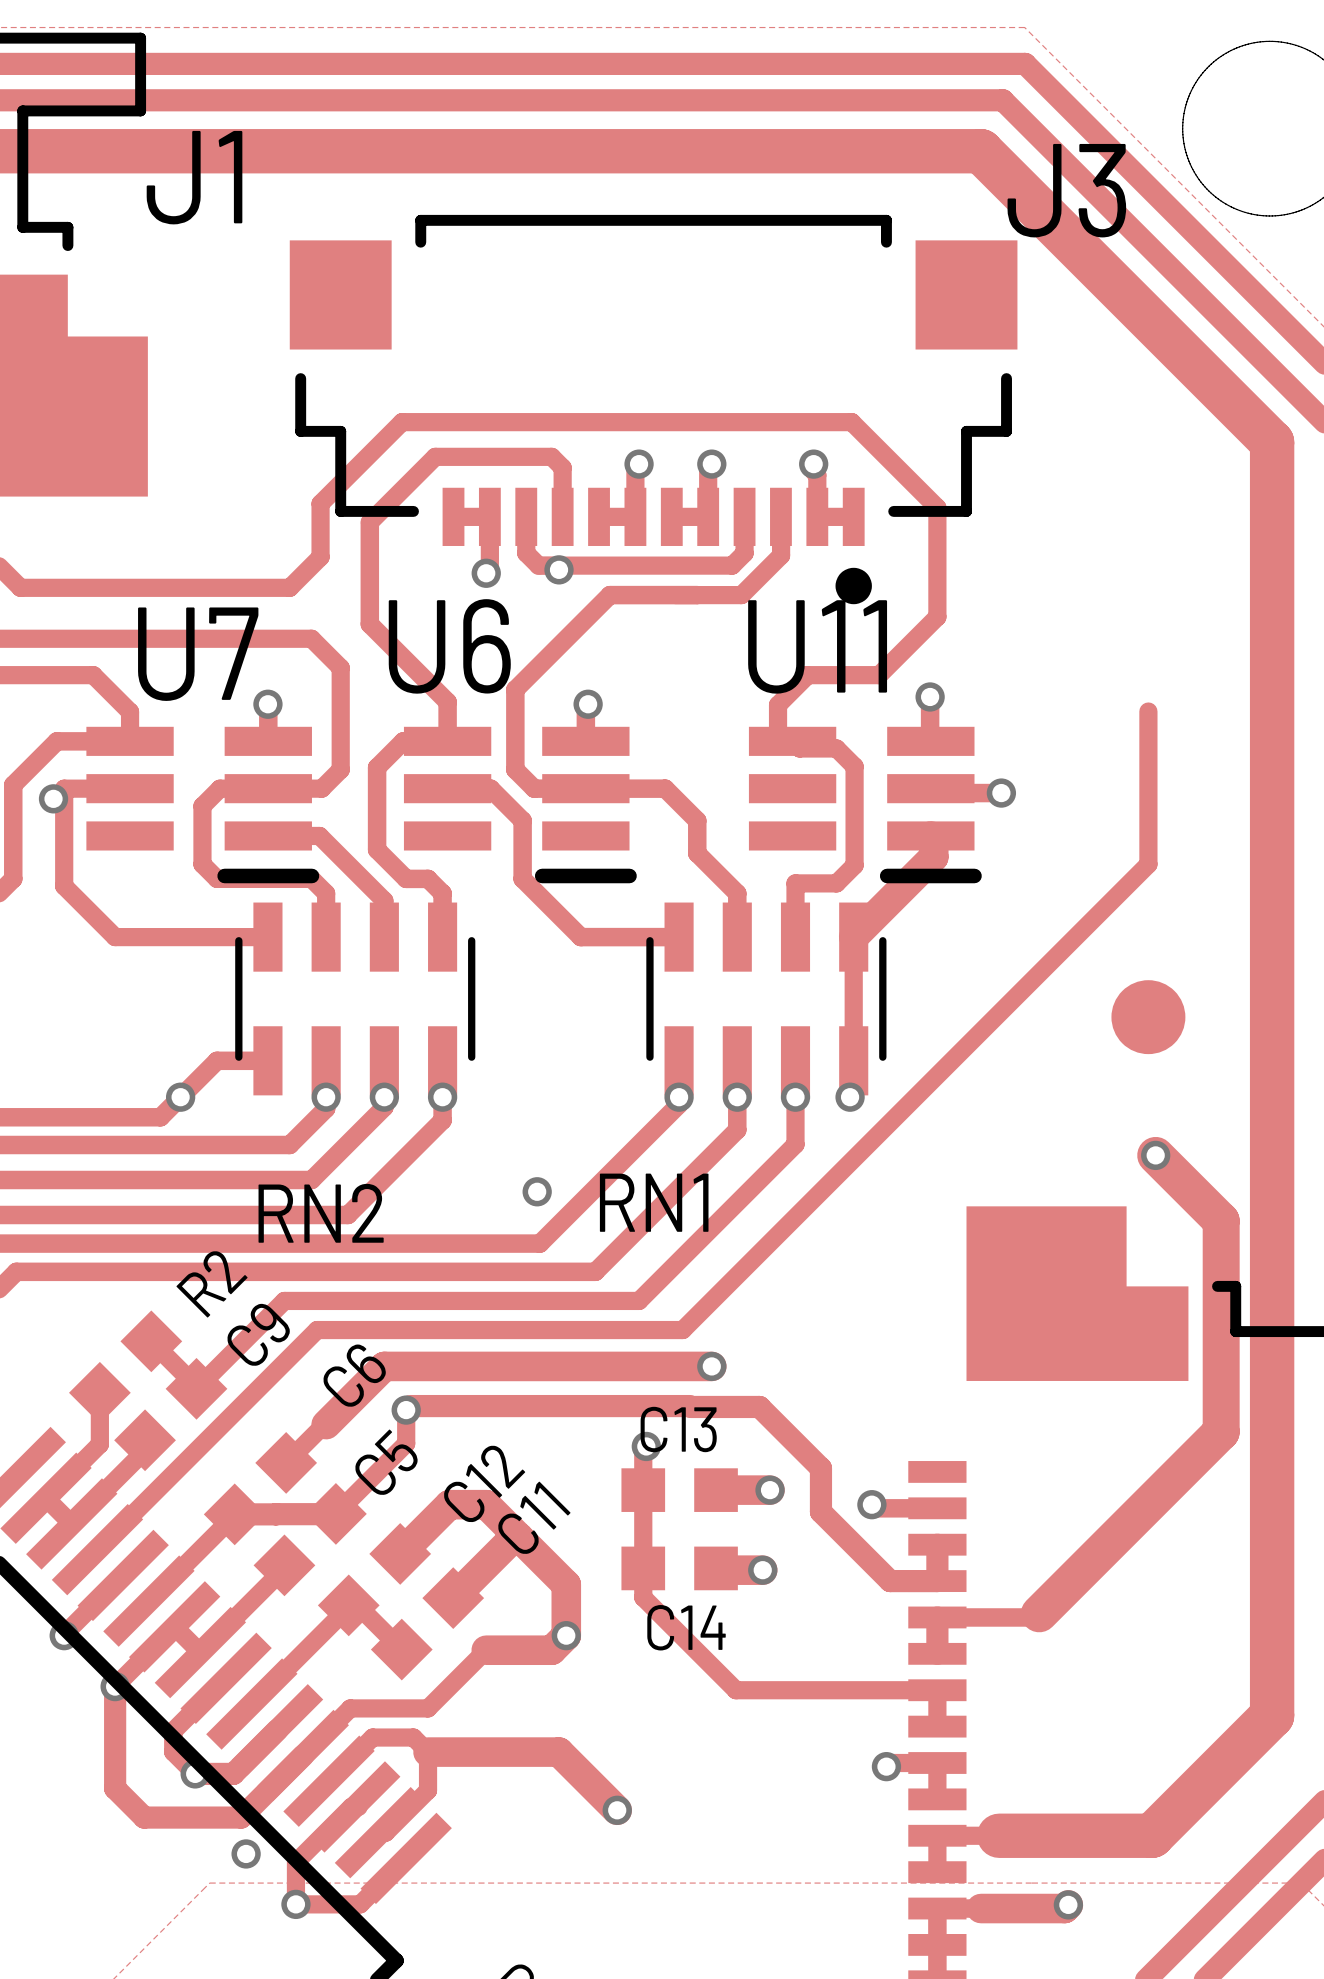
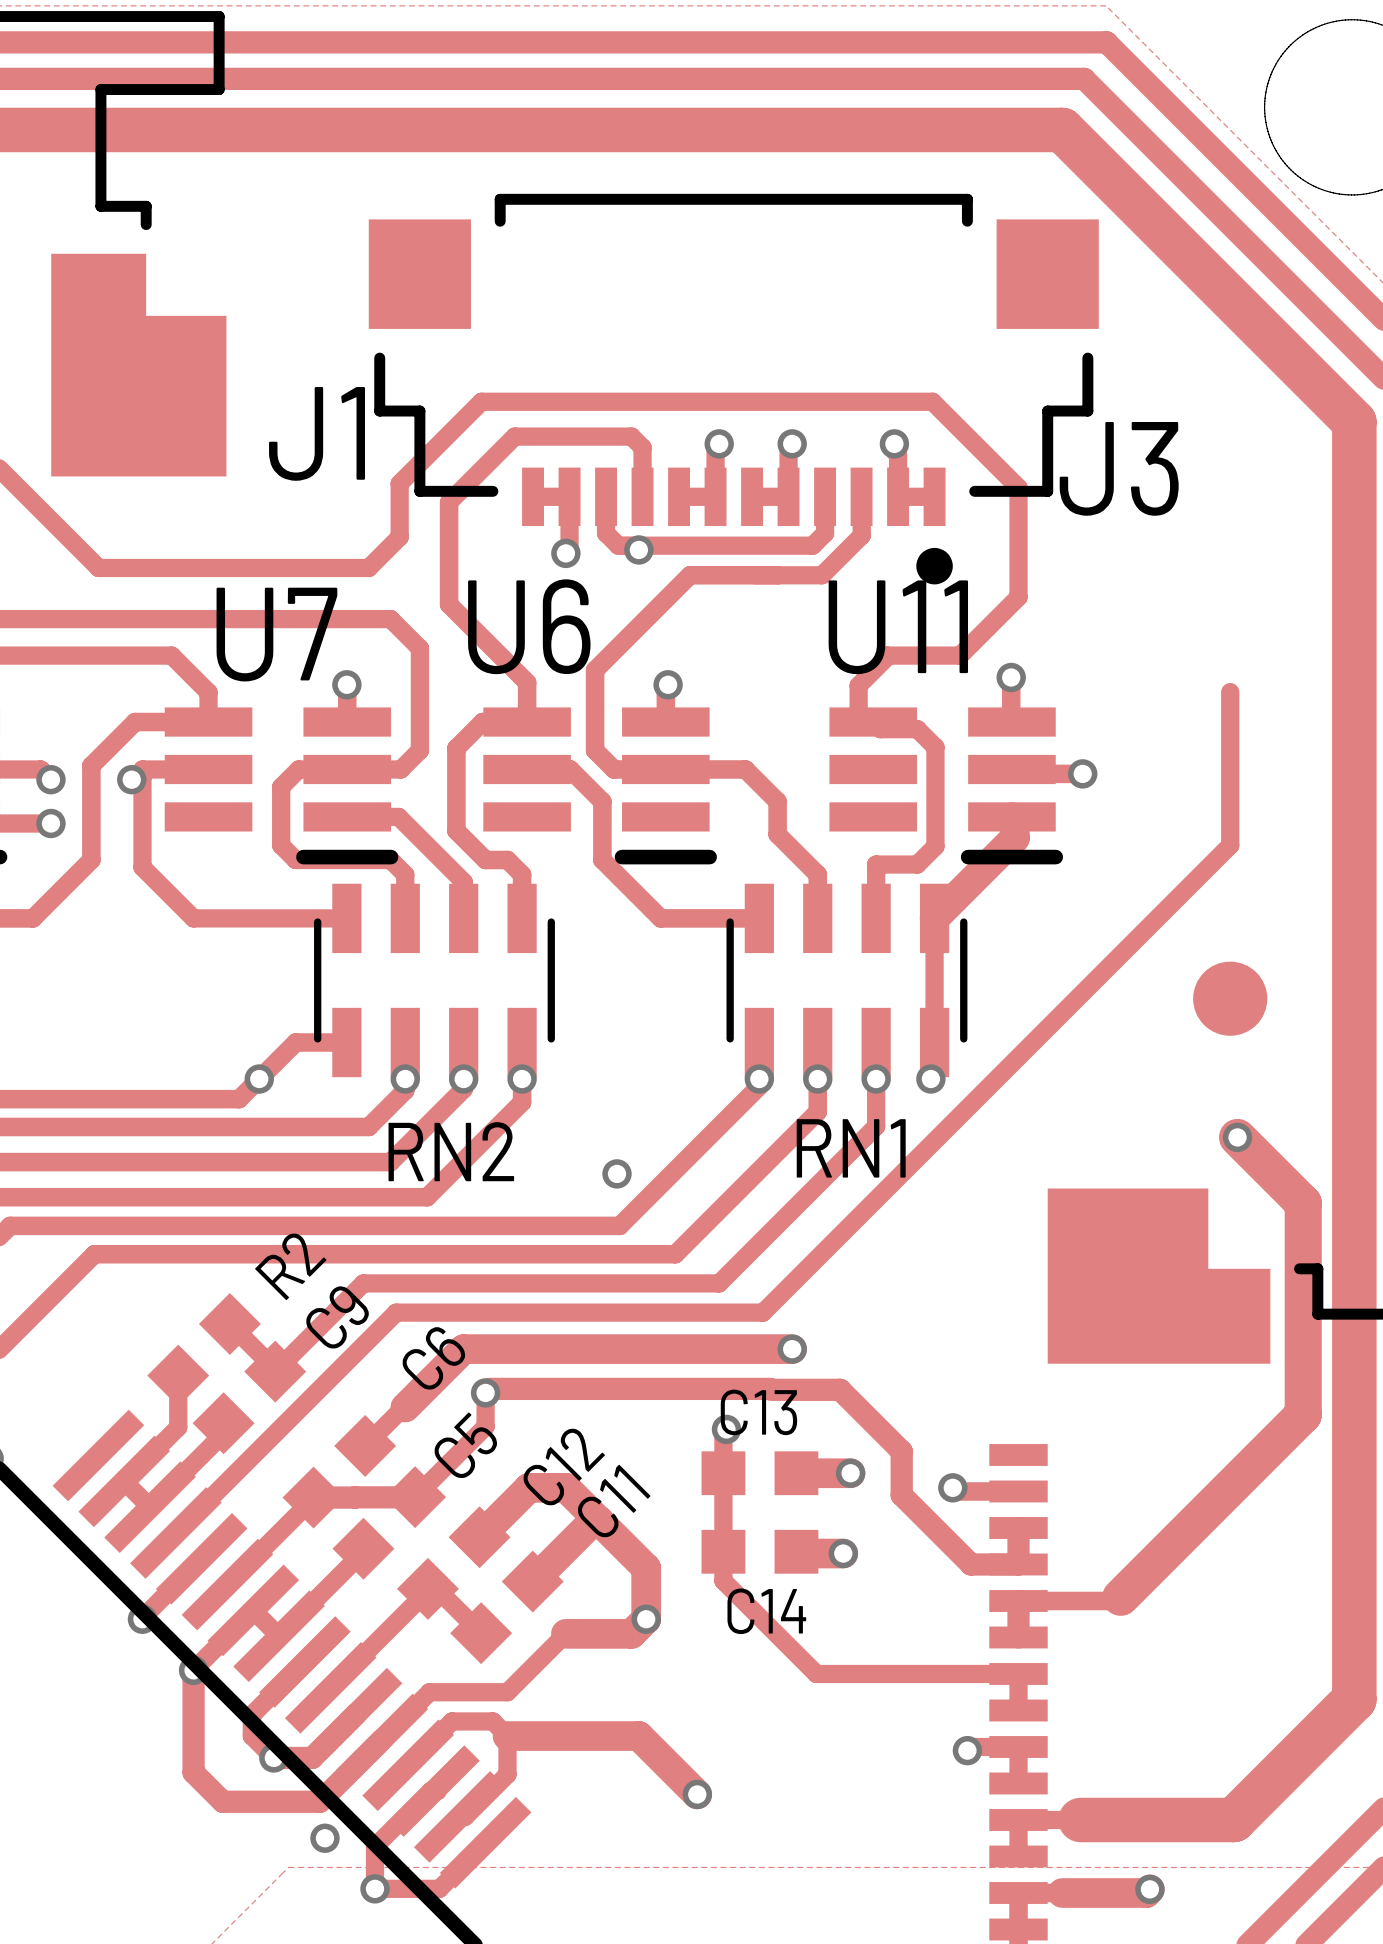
J1 name position: J1 (194, 177) -> J1 (317, 433)
J3 name position: J3 (1066, 190) -> J3 (1119, 468)
RN1 name position: RN1 (654, 1202) -> RN1 (851, 1148)
RN2 name position: RN2 (321, 1213) -> RN2 (451, 1151)

